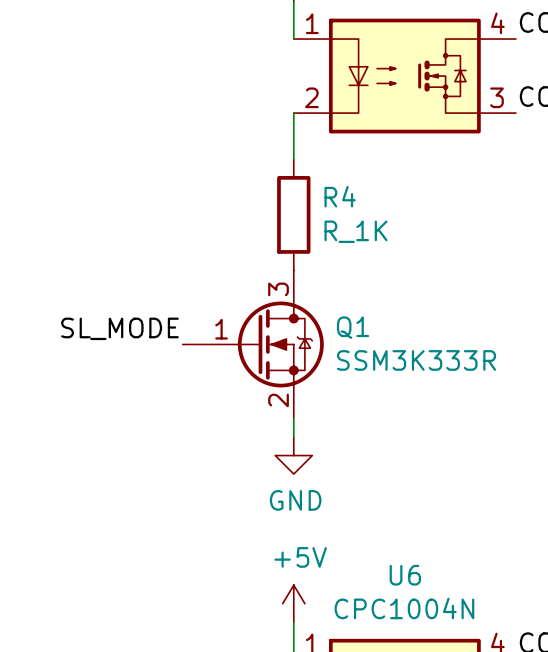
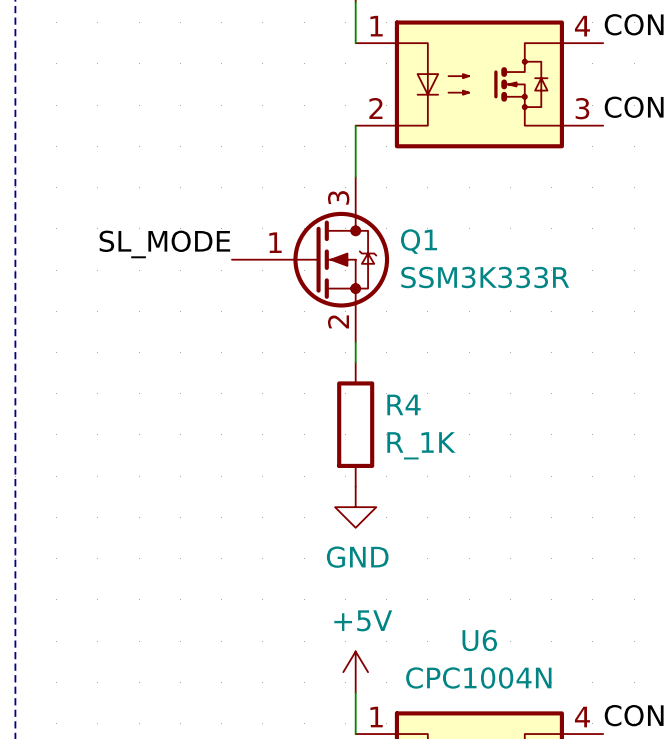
R4 position: (293, 214) -> (355, 424)
label position: SL_MODE (119, 328) -> SL_MODE (164, 244)
Q1 position: (253, 344) -> (310, 259)

